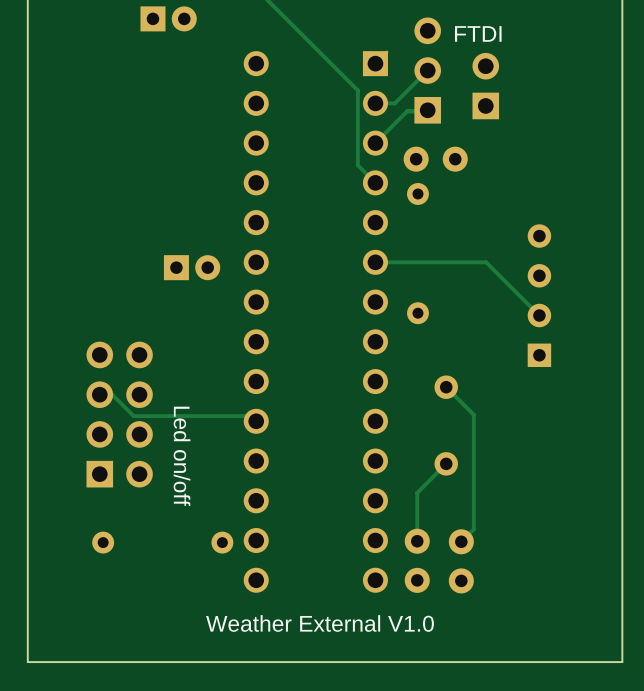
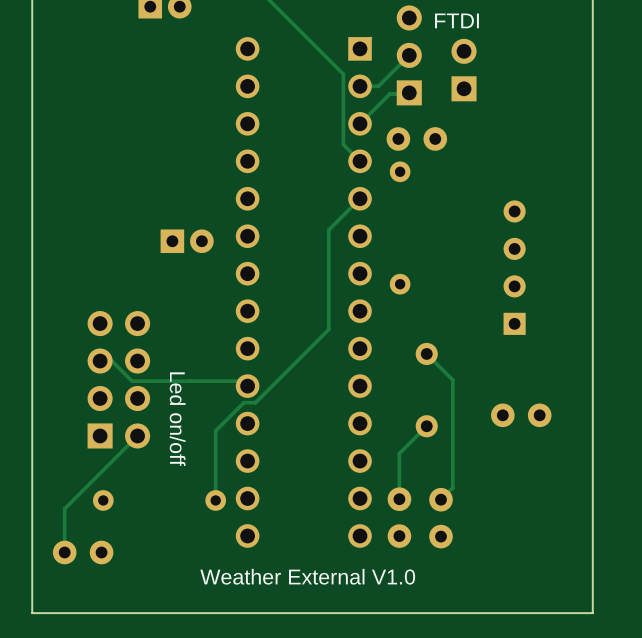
track: none -> (360, 198) (328, 230) (328, 329) (255, 402) (243, 402) (215, 430) (215, 500)
track: (375, 262) (486, 262) (539, 315) -> none
part: none -> (521, 415)
track: none -> (137, 435) (64, 508) (64, 552)
part: none -> (83, 552)

